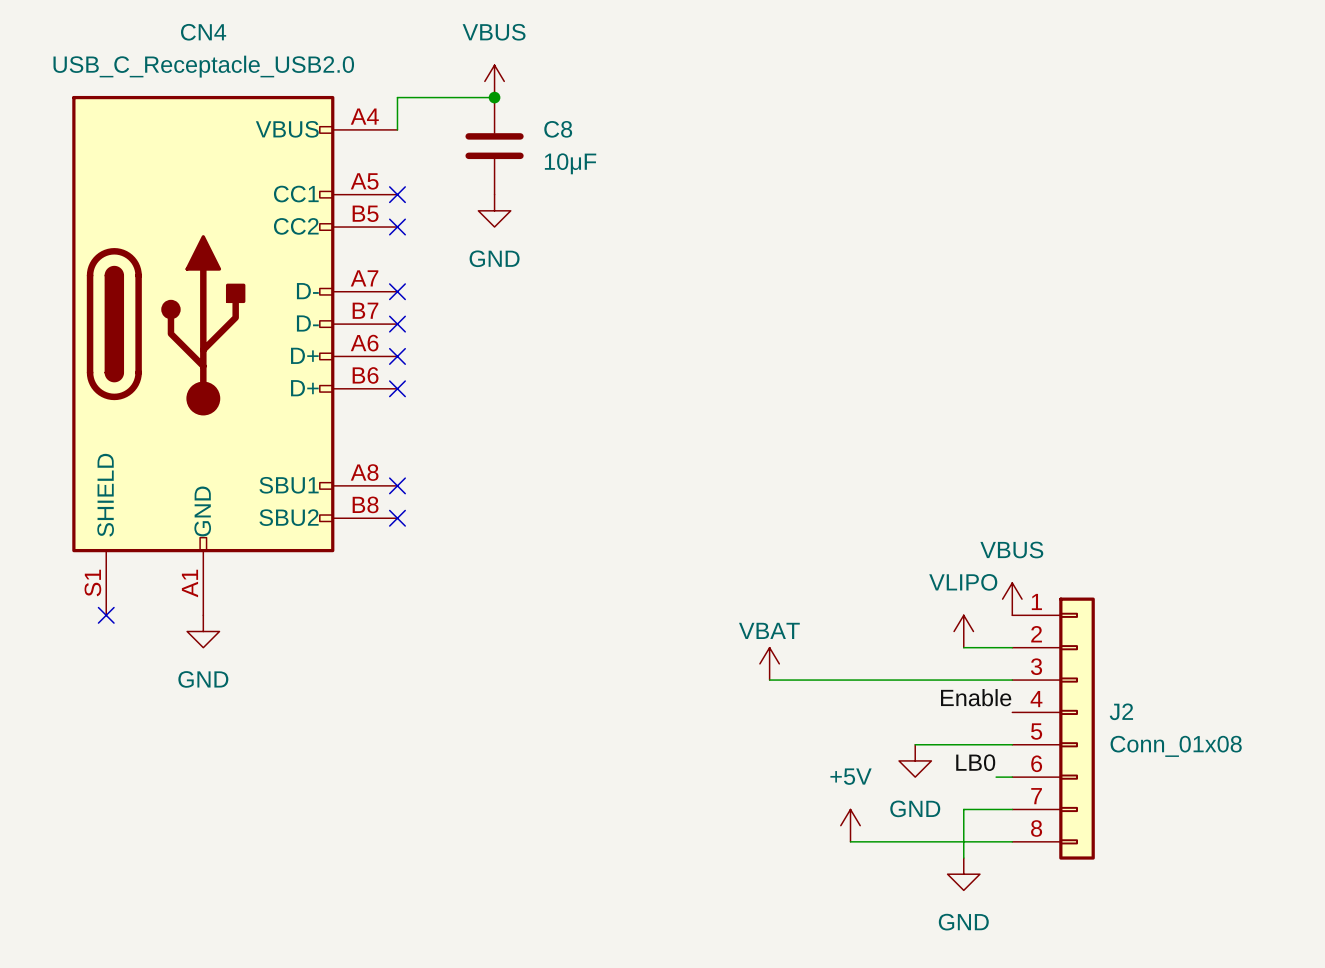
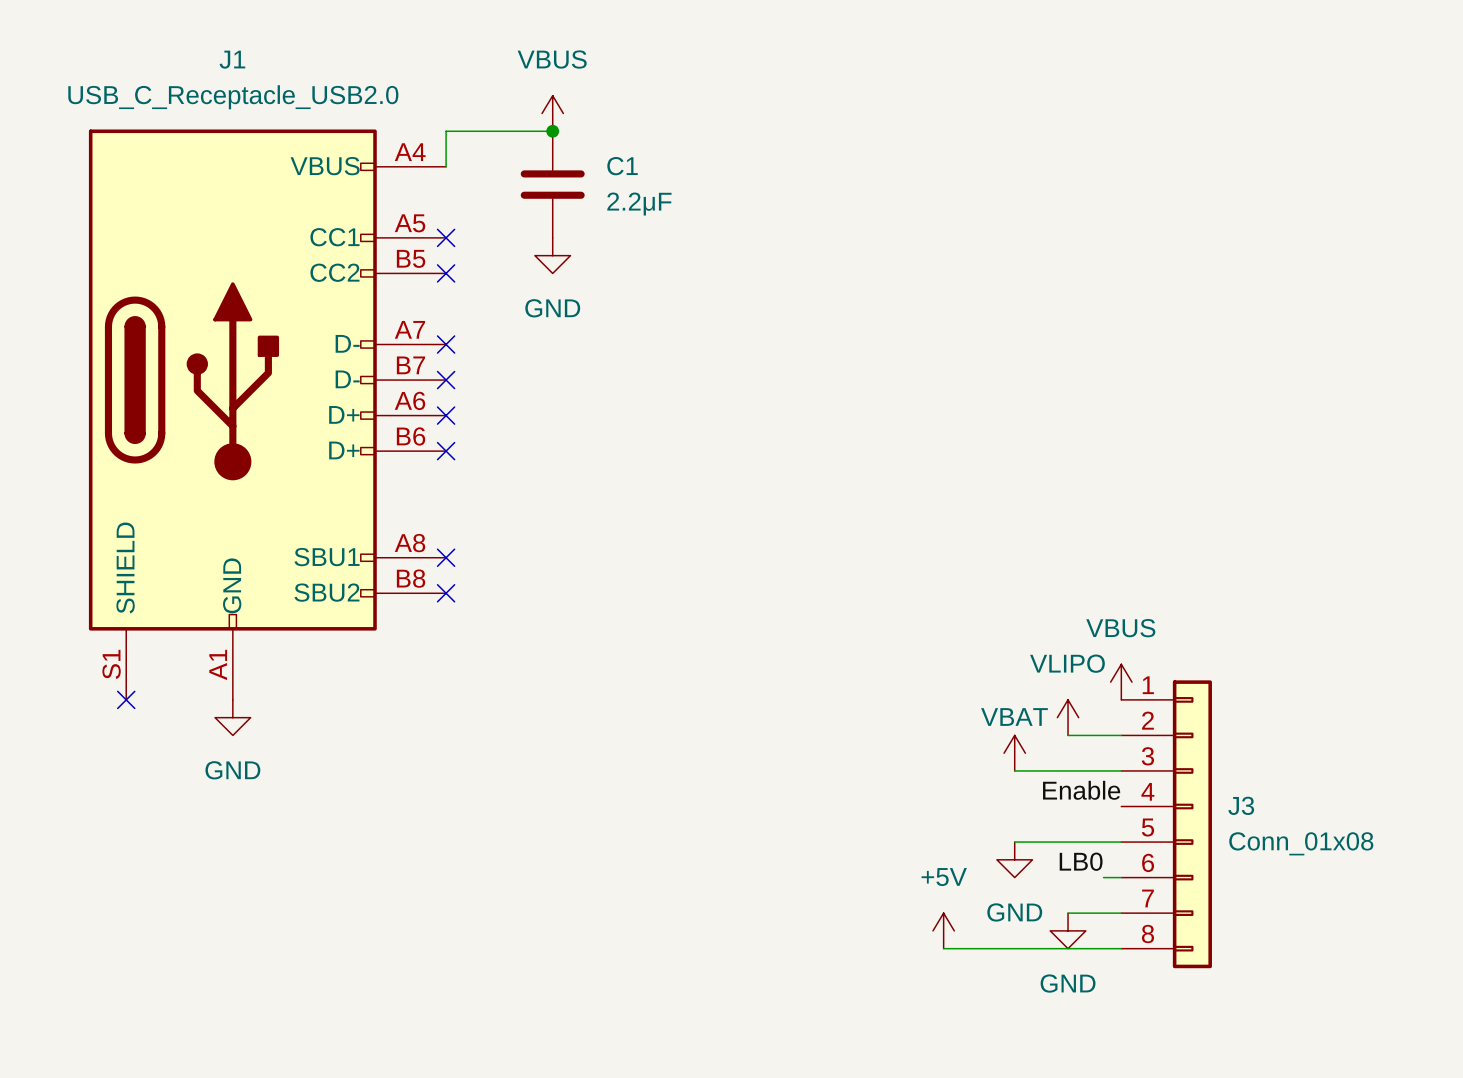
CN4 name: CN4 (203, 32) -> J1 (232, 59)
C8 name: C8 (558, 129) -> C1 (622, 166)
C8 value: 10μF (570, 163) -> 2.2μF (639, 204)
power symbol position: VBAT (769, 663) -> VBAT (1014, 753)
wire: (769, 680) (915, 680) -> none
J2 name: J2 (1121, 711) -> J3 (1241, 805)
wire: (963, 809) (963, 858) -> none
power symbol position: GND (963, 874) -> GND (1068, 930)

